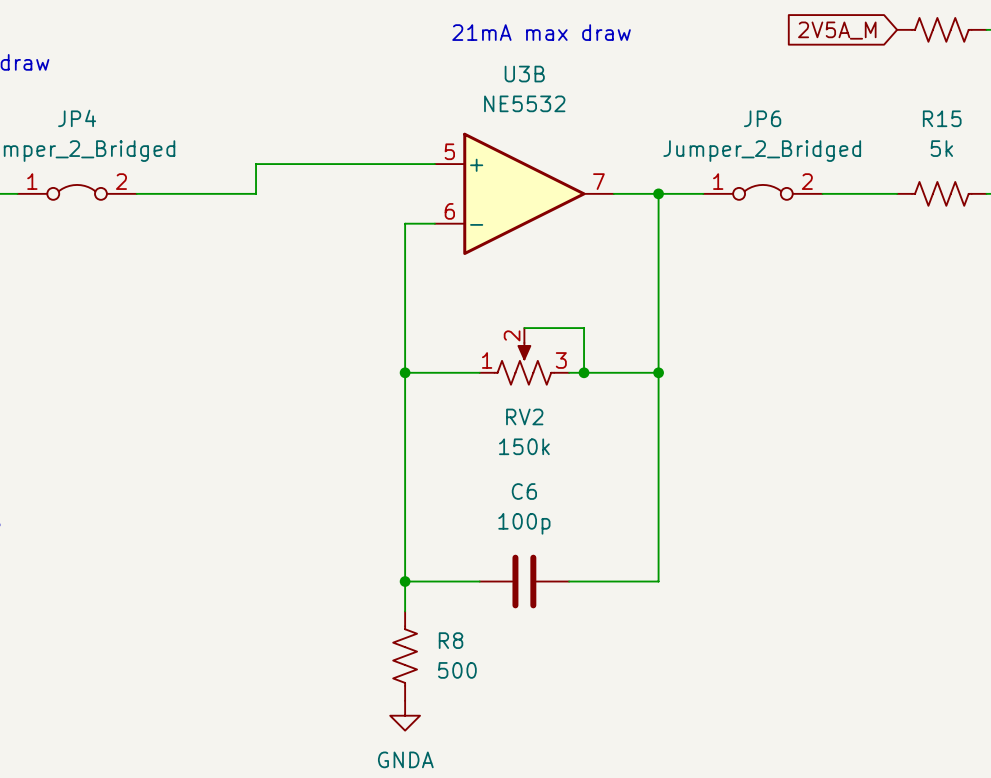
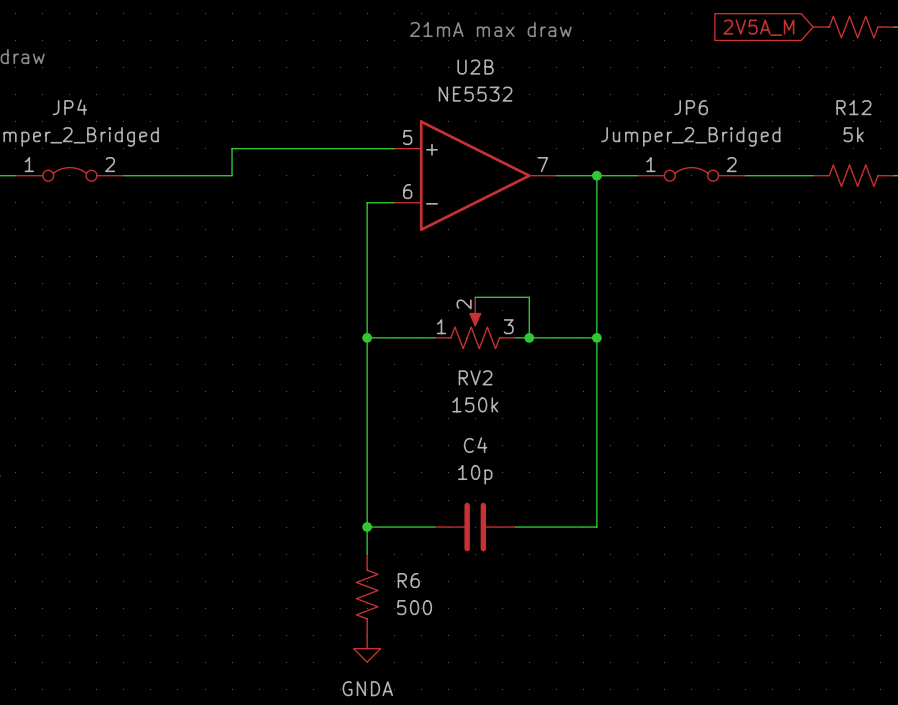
U3B name: U3B (524, 74) -> U2B (475, 67)
R15 name: R15 (942, 118) -> R12 (853, 107)
C6 name: C6 (524, 491) -> C4 (475, 445)
C6 value: 100p (524, 523) -> 10p (475, 474)
R8 name: R8 (451, 640) -> R6 (408, 580)

